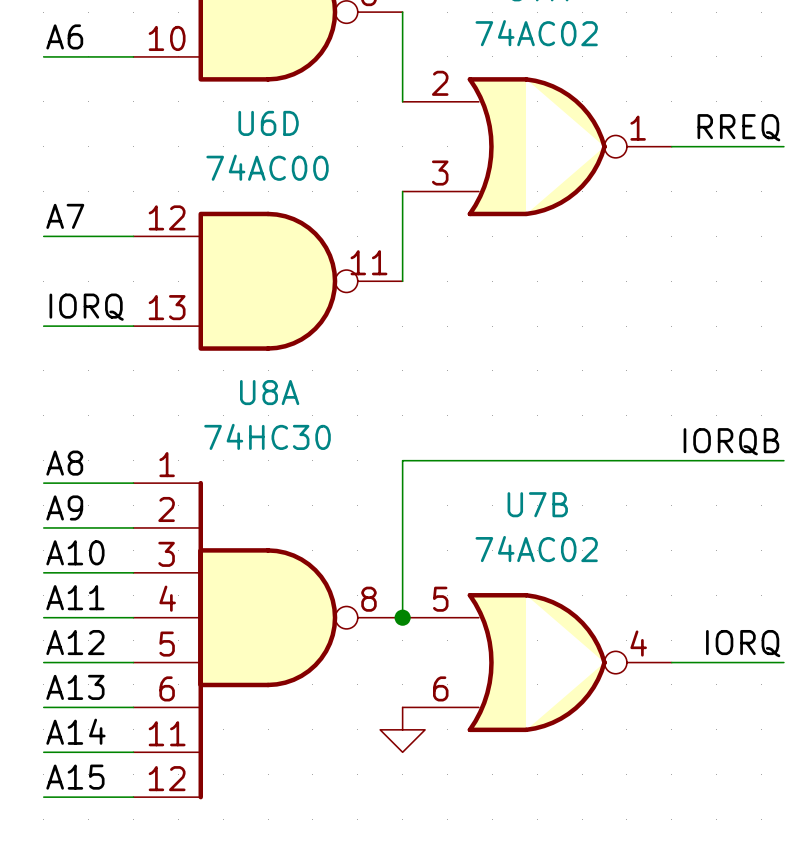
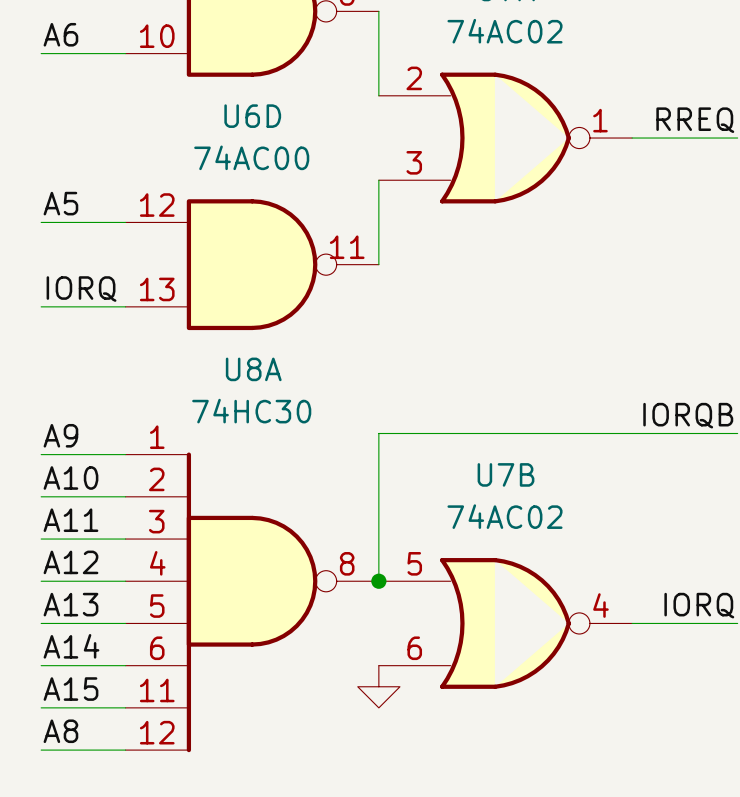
label: A7 (65, 216) -> A5 (60, 203)
label: A8 (64, 463) -> A9 (60, 435)
label: A9 (64, 507) -> A10 (70, 477)
label: A10 (75, 552) -> A11 (70, 520)
label: A11 (75, 597) -> A12 (70, 562)
label: A12 (75, 642) -> A13 (70, 604)
label: A13 (75, 687) -> A14 (71, 646)
label: A14 (75, 731) -> A15 (70, 689)
label: A15 (75, 777) -> A8 (60, 731)

